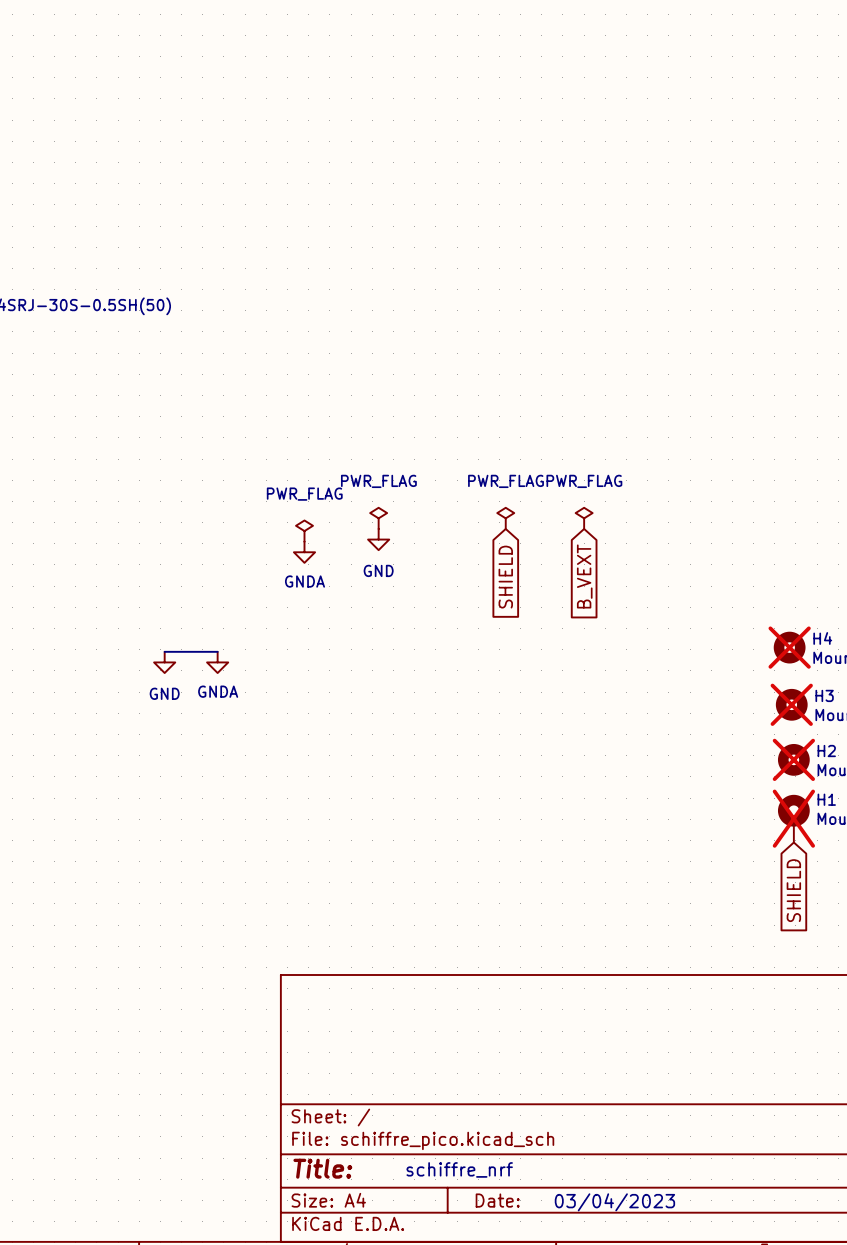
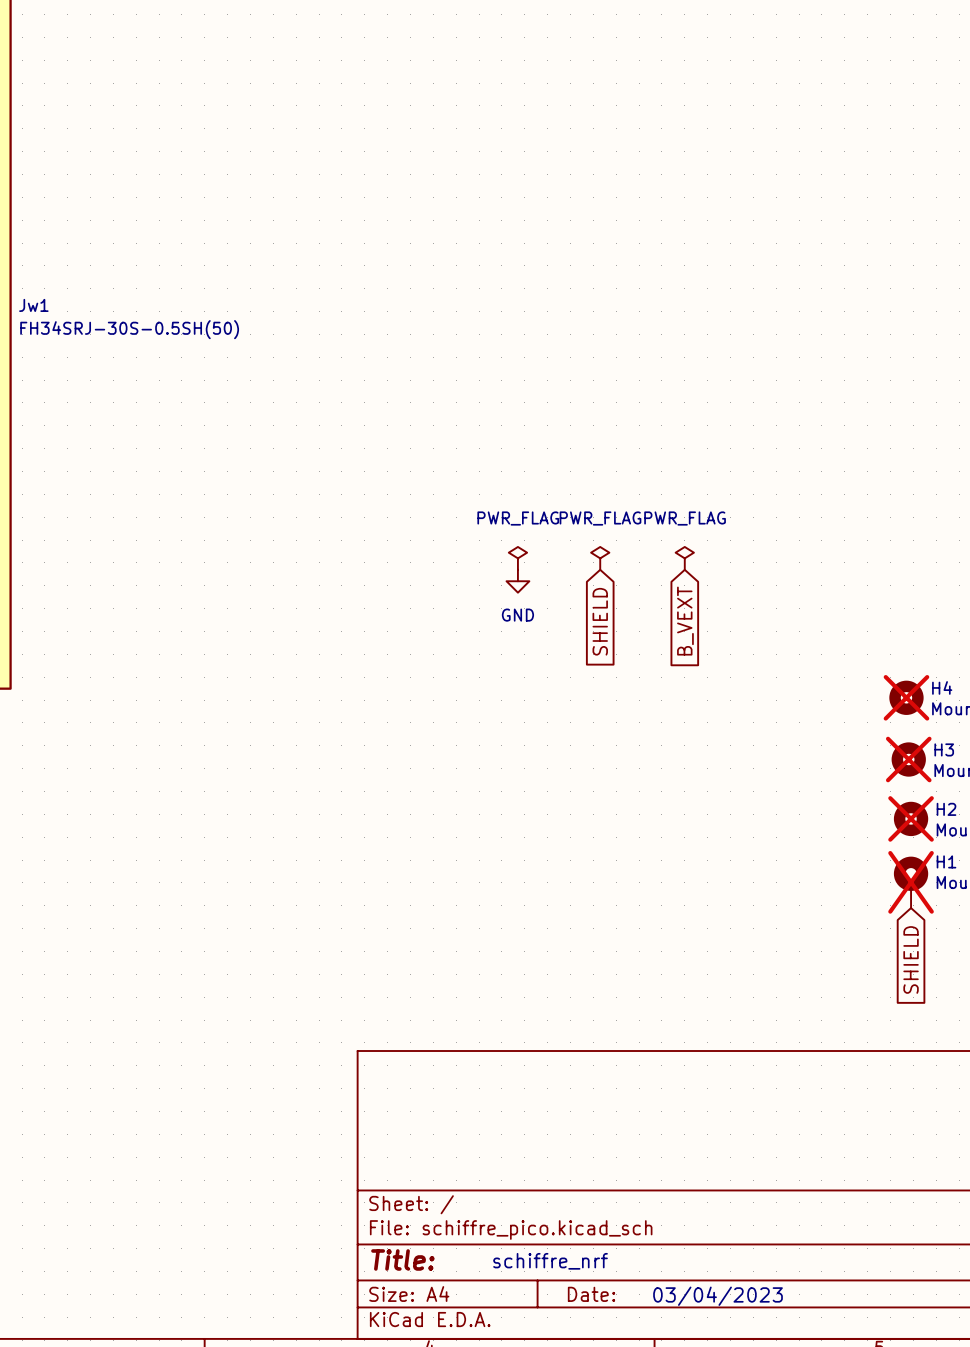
power symbol position: PWR_FLAG (378, 518) -> PWR_FLAG (517, 558)
power symbol: PWR_FLAG (304, 531) -> none
power symbol position: GND (378, 539) -> GND (517, 581)
power symbol: GNDA (304, 552) -> none
wire: (164, 651) (217, 651) -> none
power symbol: GND (164, 662) -> none
power symbol: GNDA (217, 662) -> none

